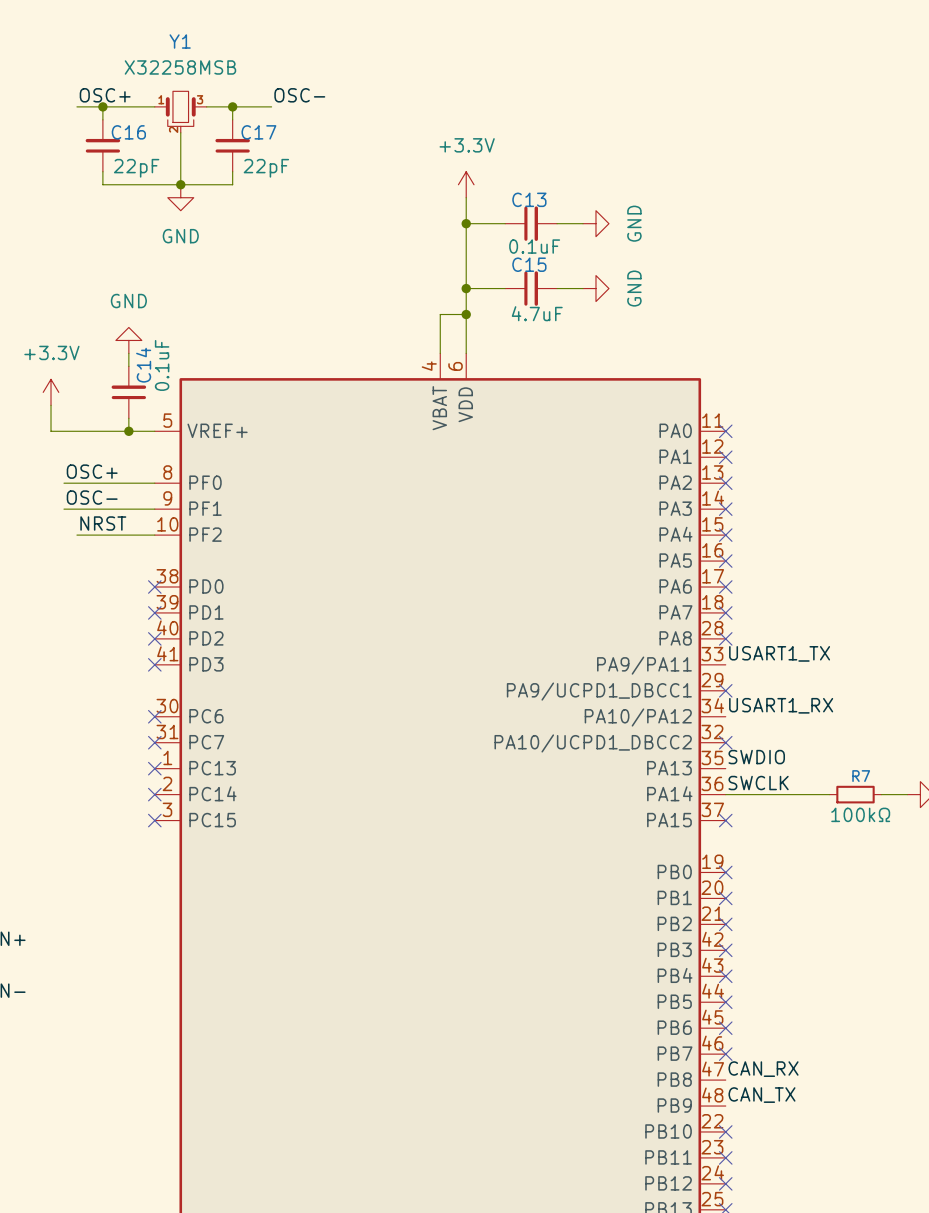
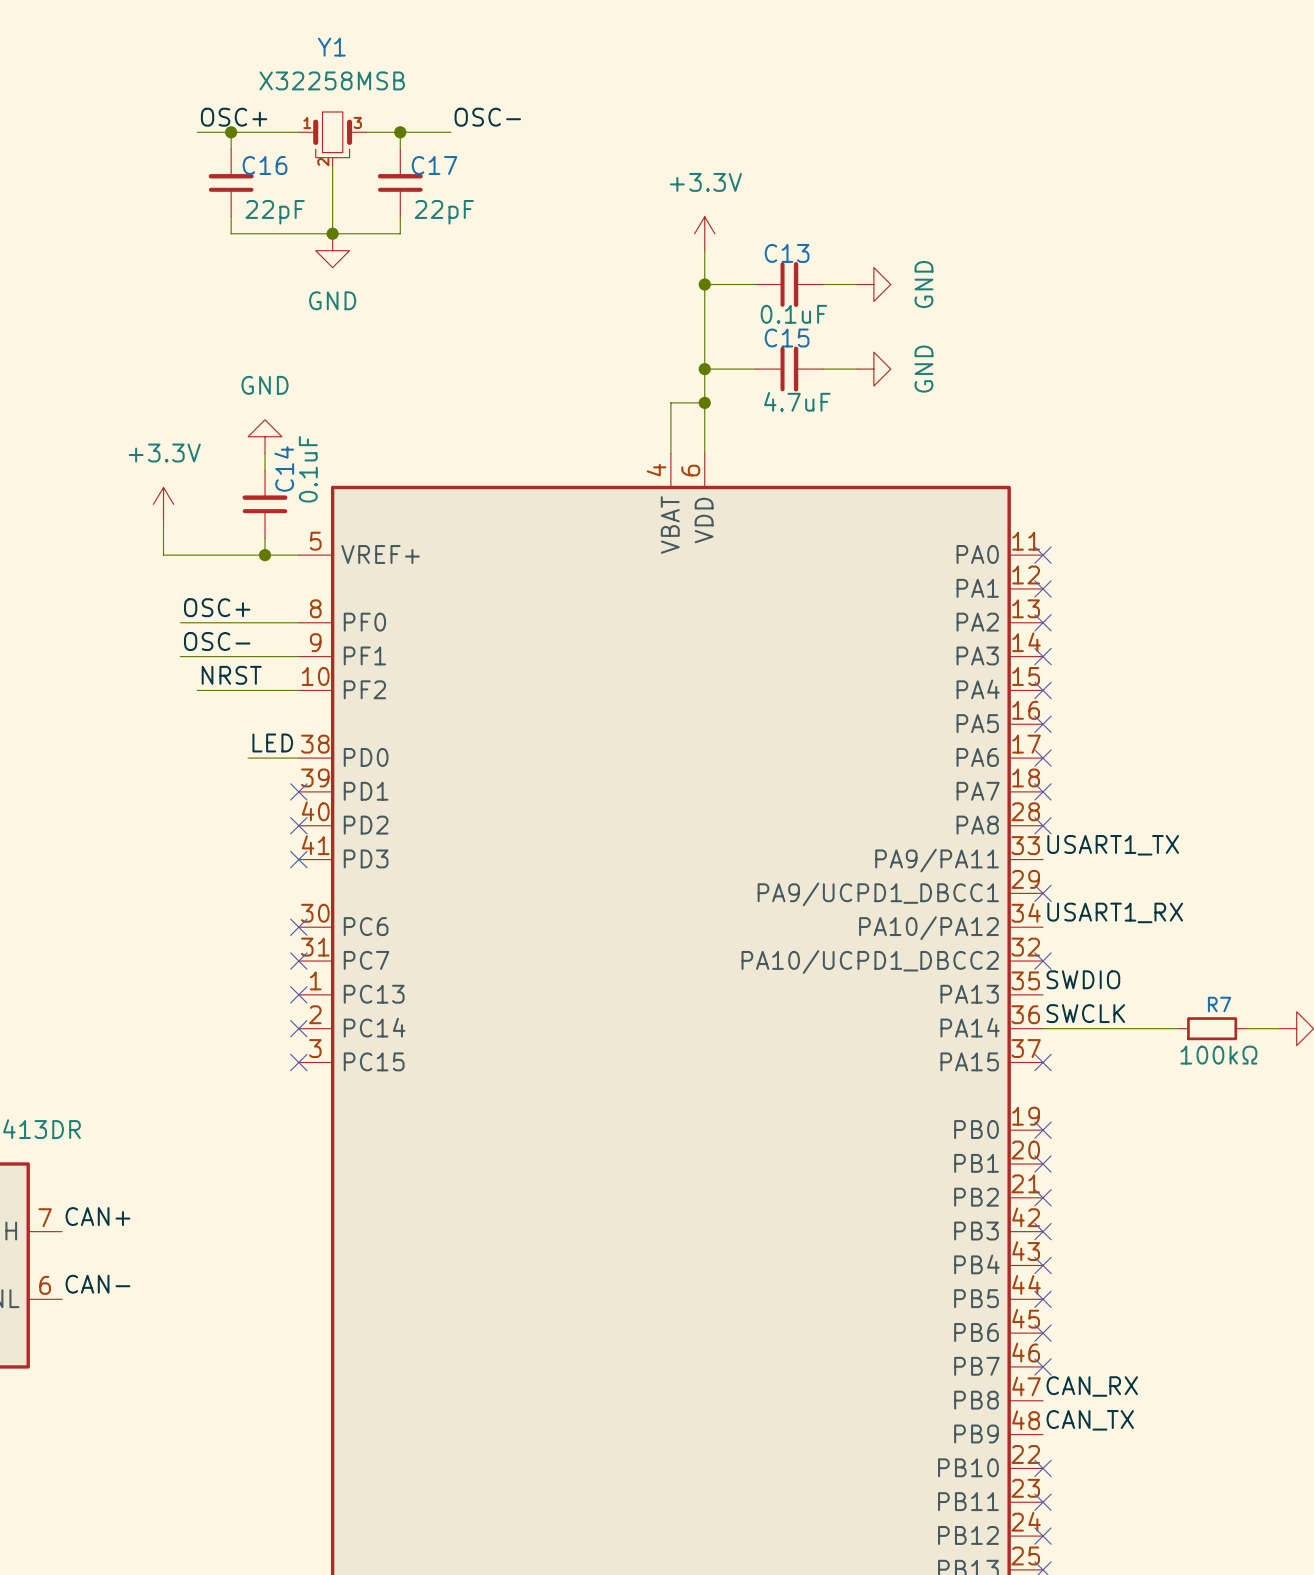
label: none -> LED (272, 742)
wire: none -> (248, 758) (298, 758)
no-connect mark: (154, 587) -> none

